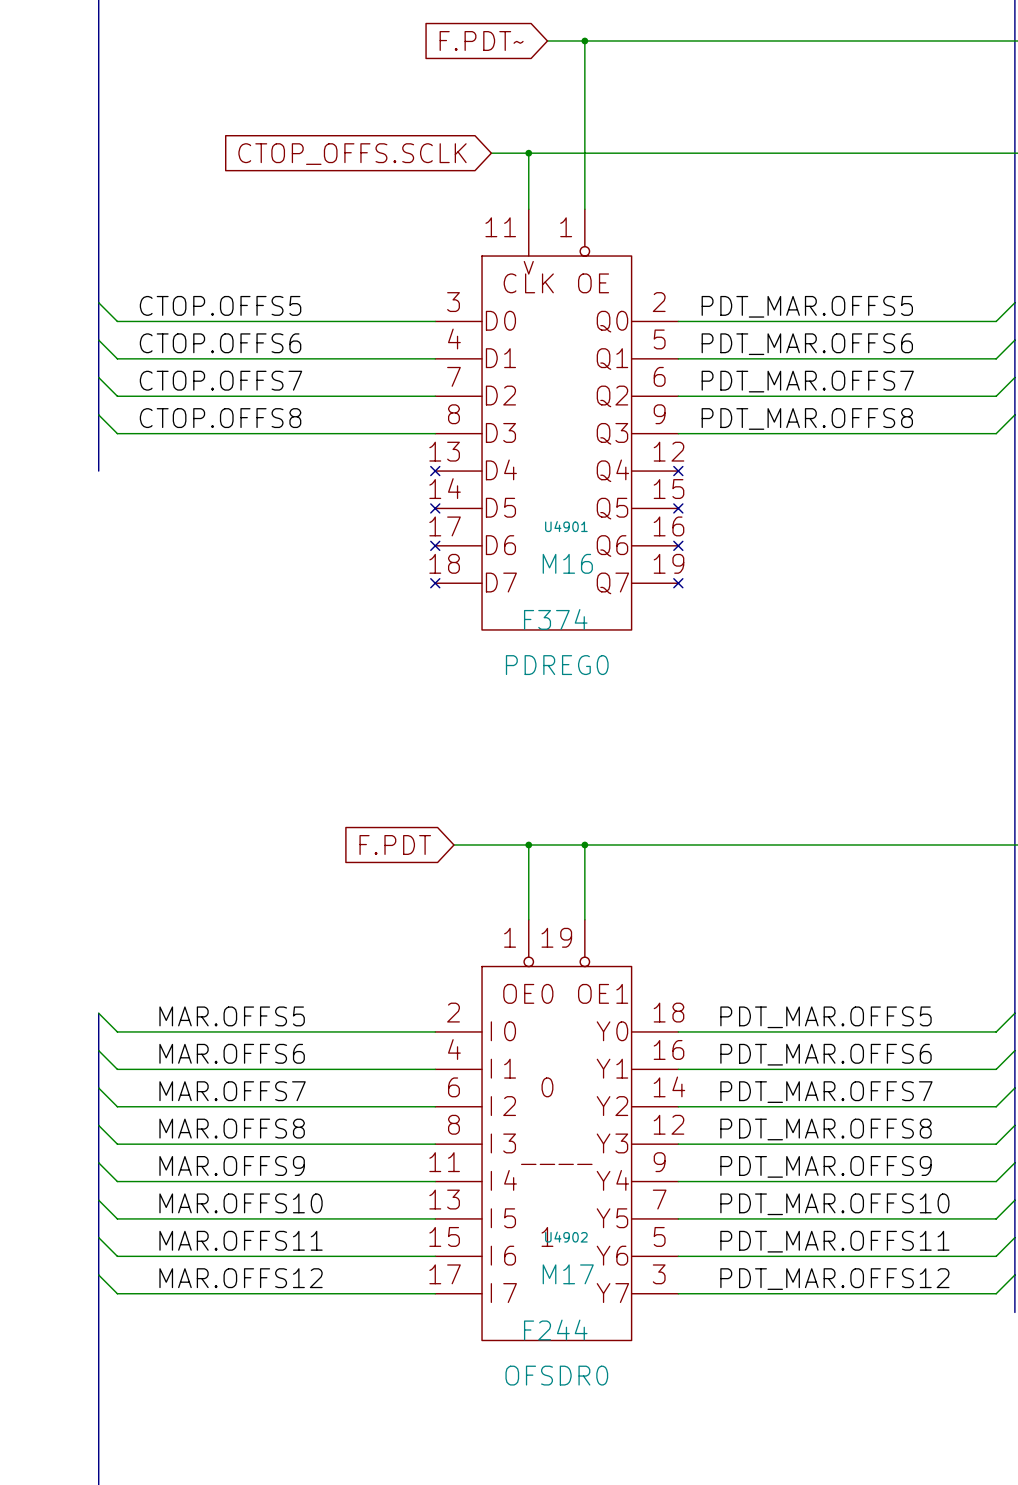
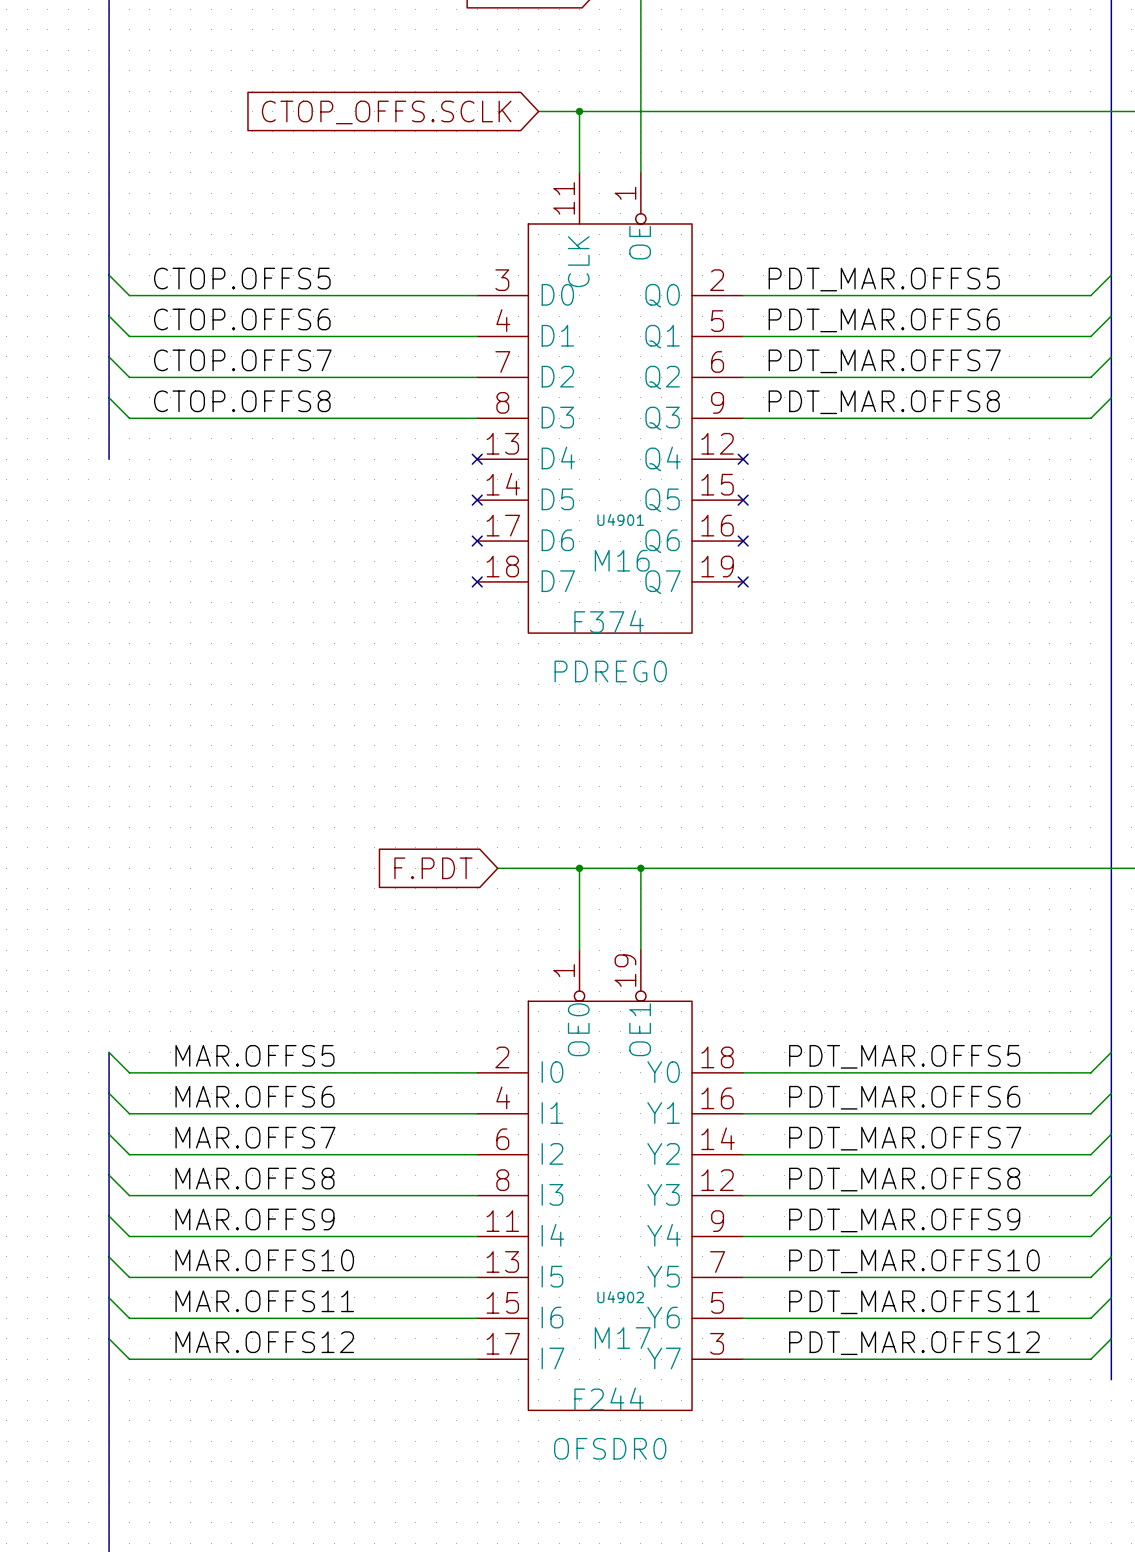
U4901 symbol: [435, 209, 679, 630] -> [477, 172, 744, 634]
U4902 symbol: [435, 919, 679, 1341] -> [477, 950, 744, 1411]

